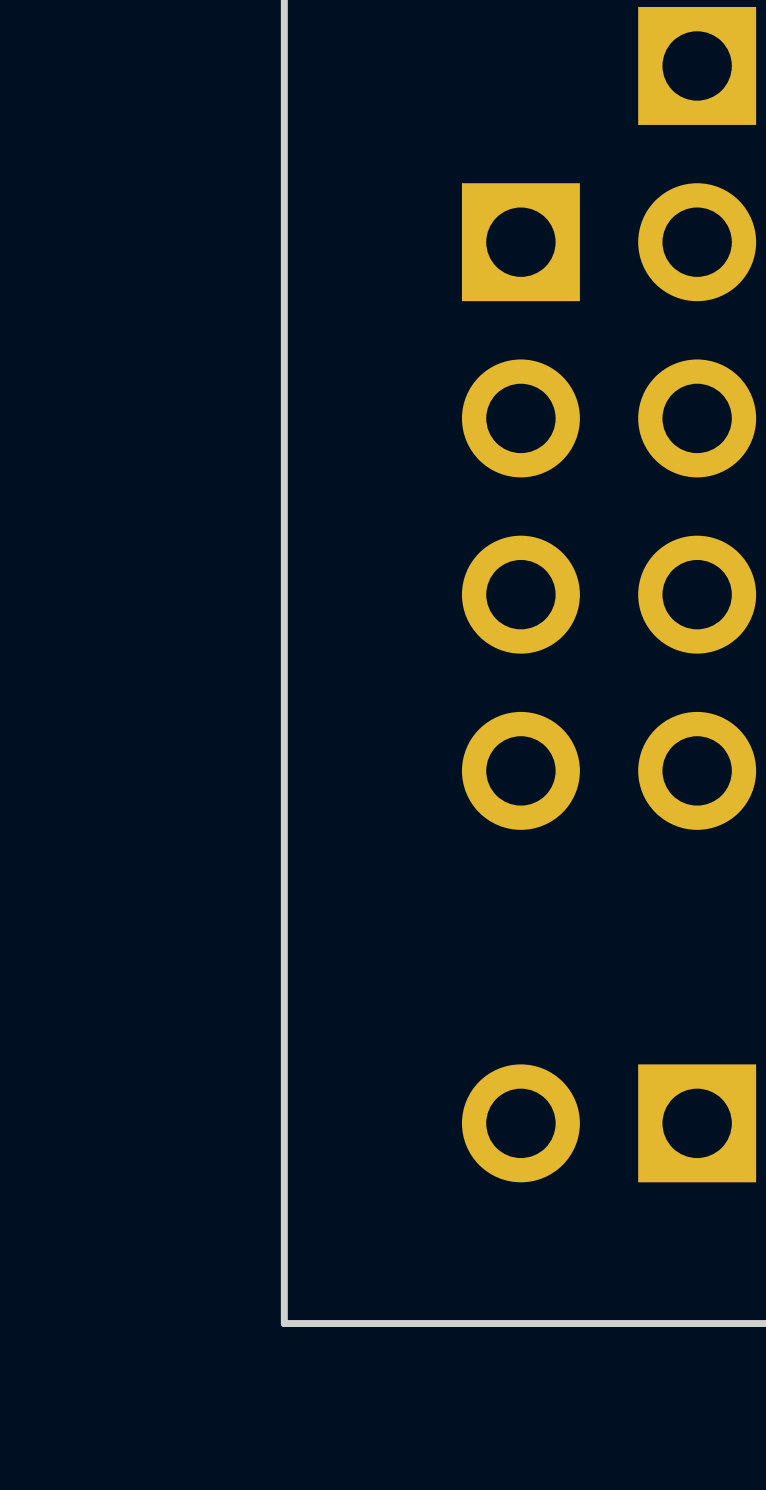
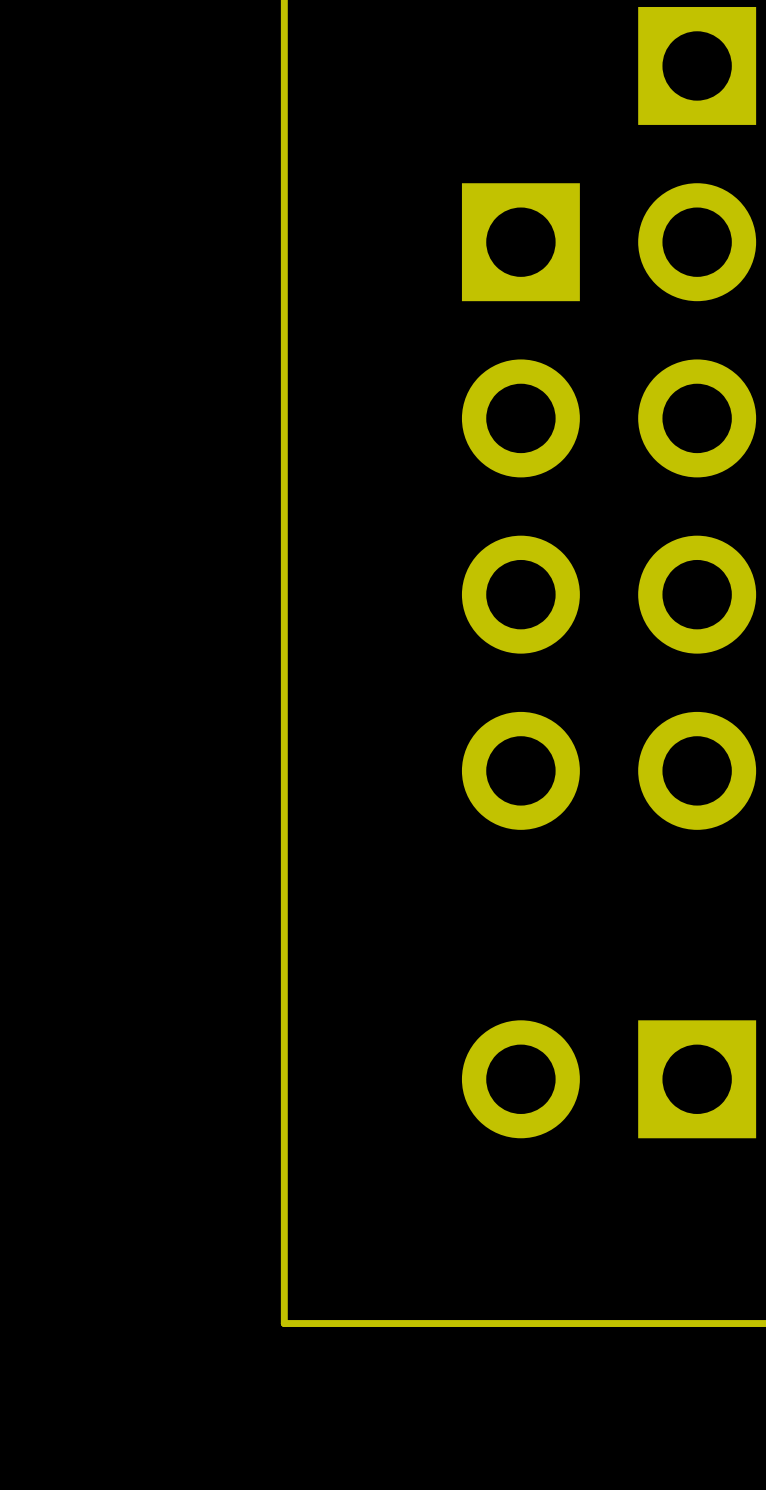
part position: (609, 1123) -> (609, 1079)

